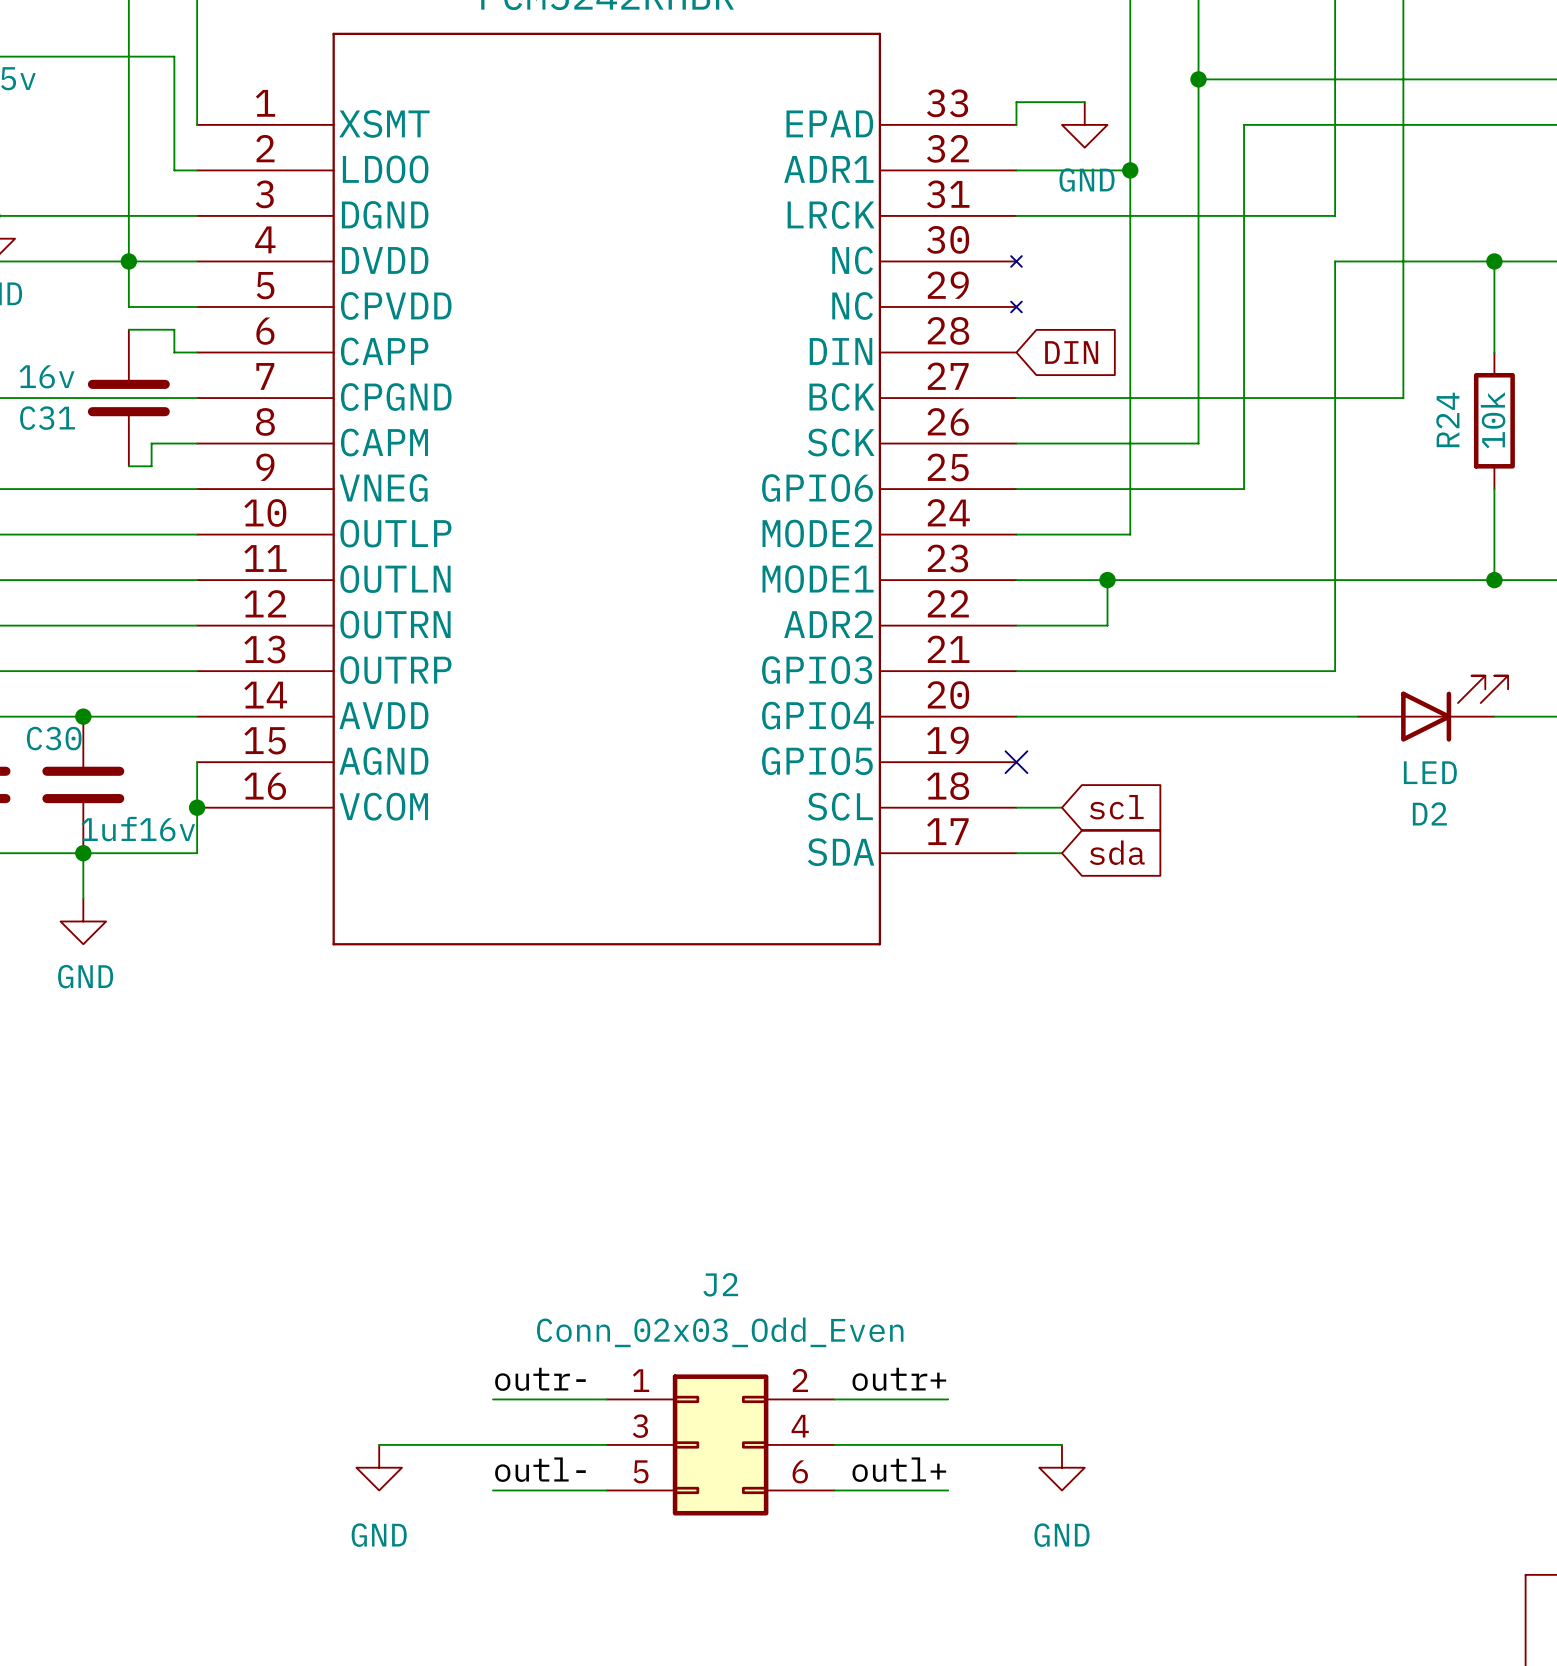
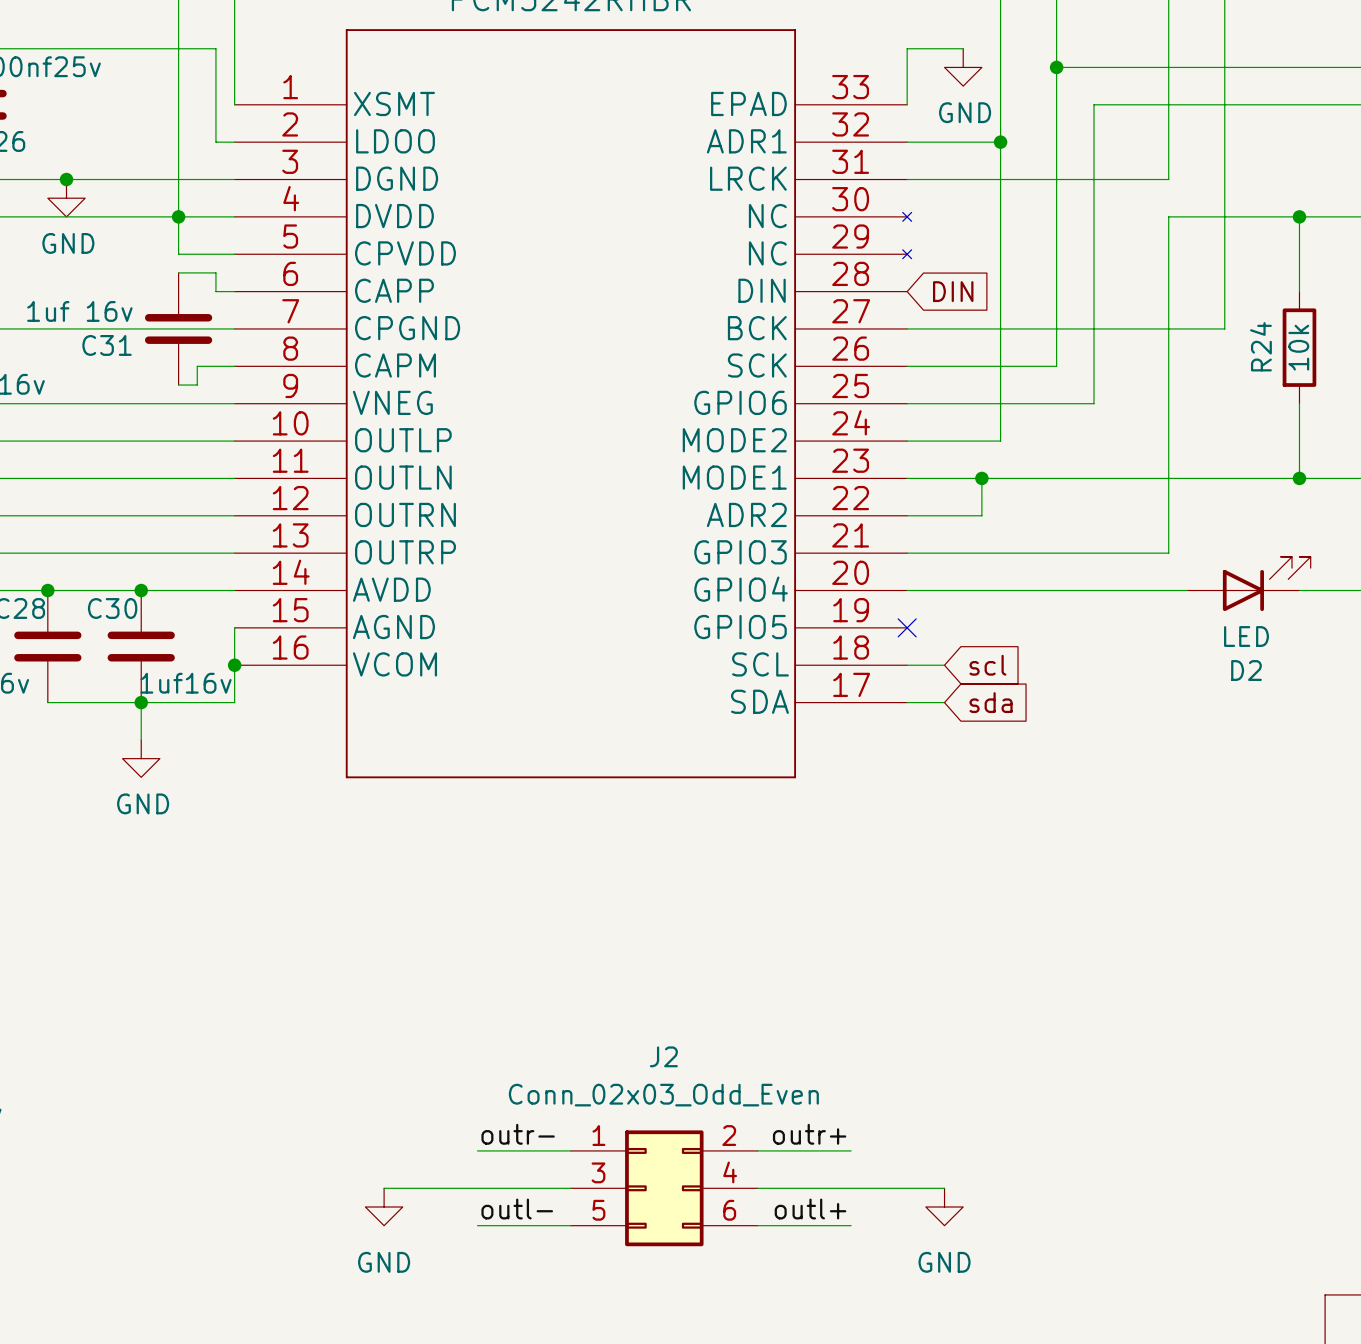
wire: (1016, 102) (1084, 102) -> (907, 86) (907, 48) (963, 48)
power symbol position: GND (1084, 124) -> GND (963, 67)

